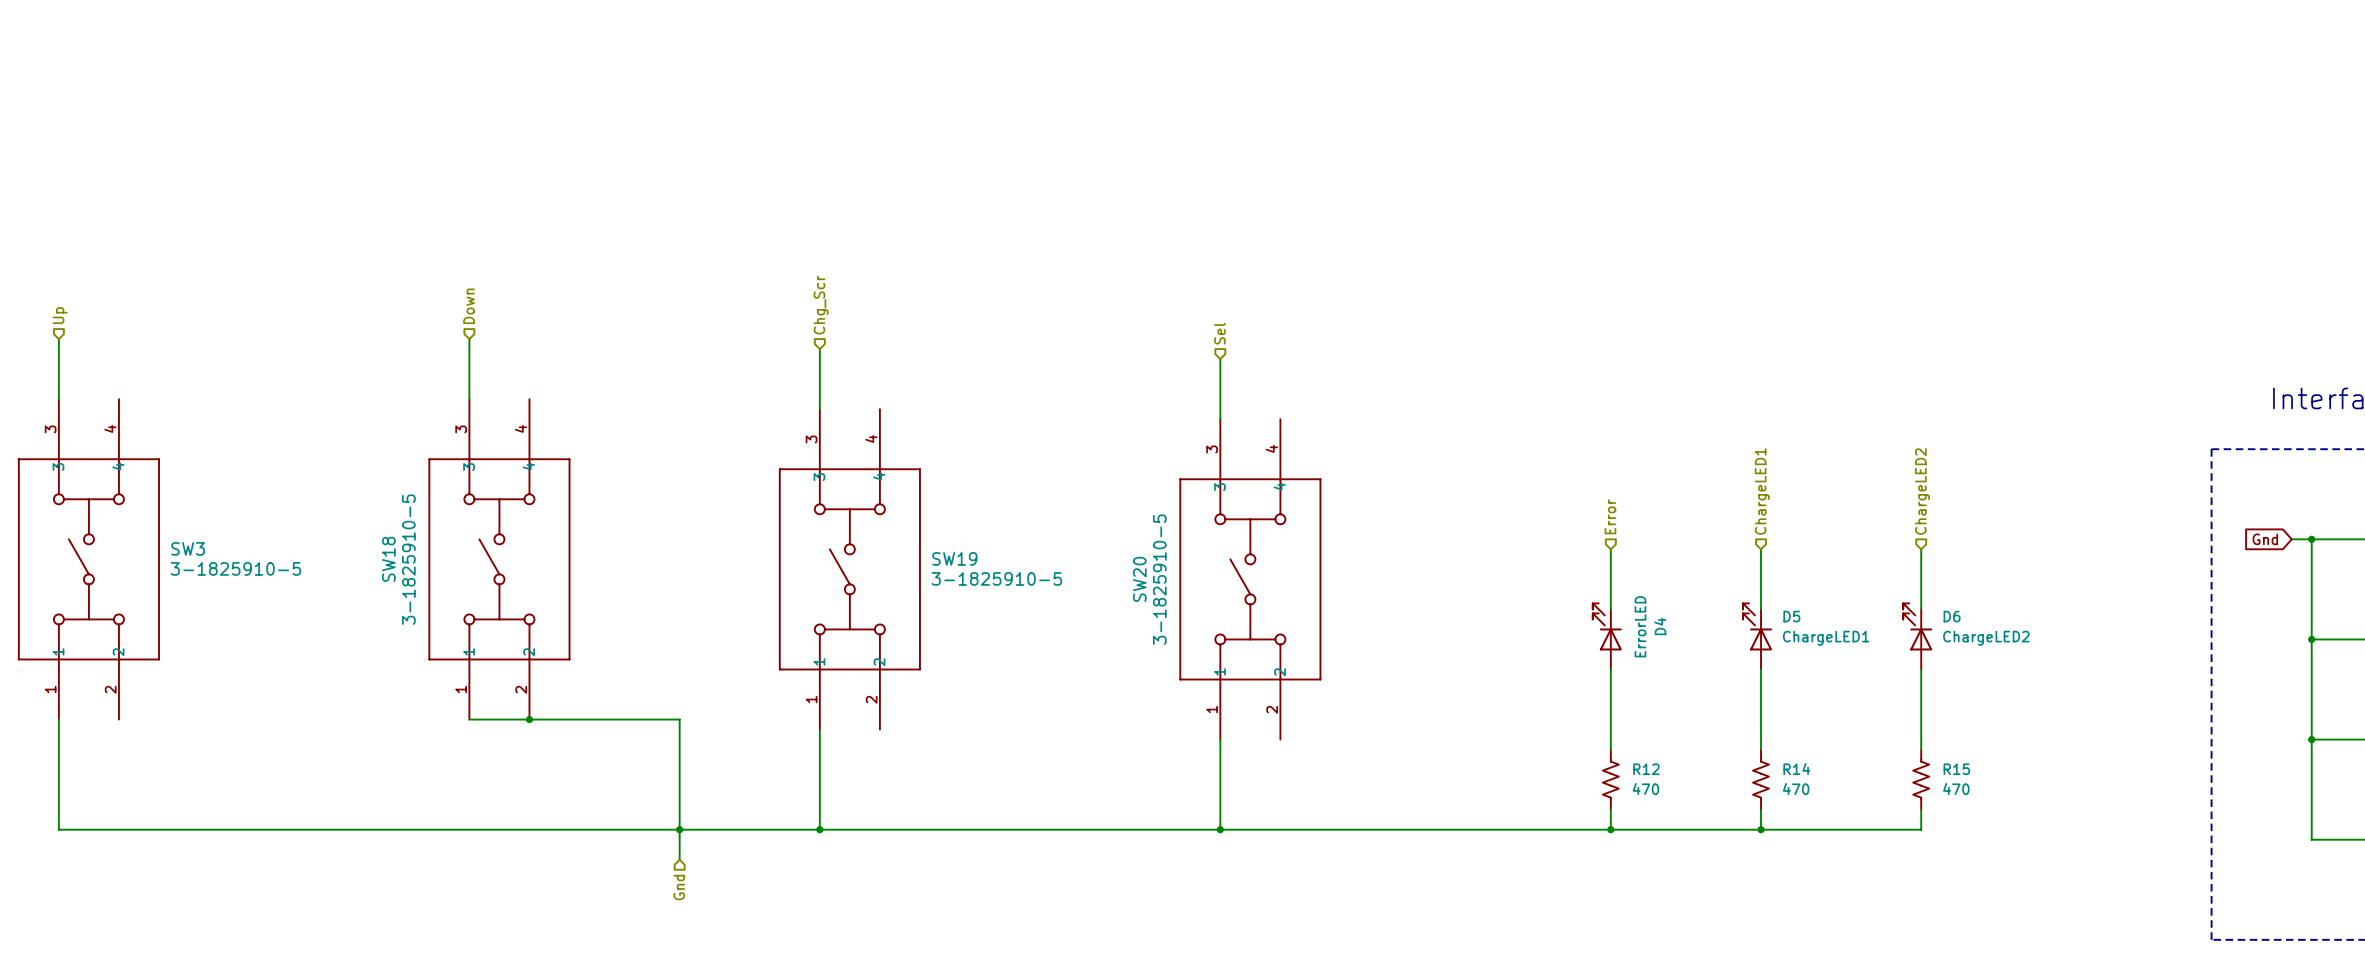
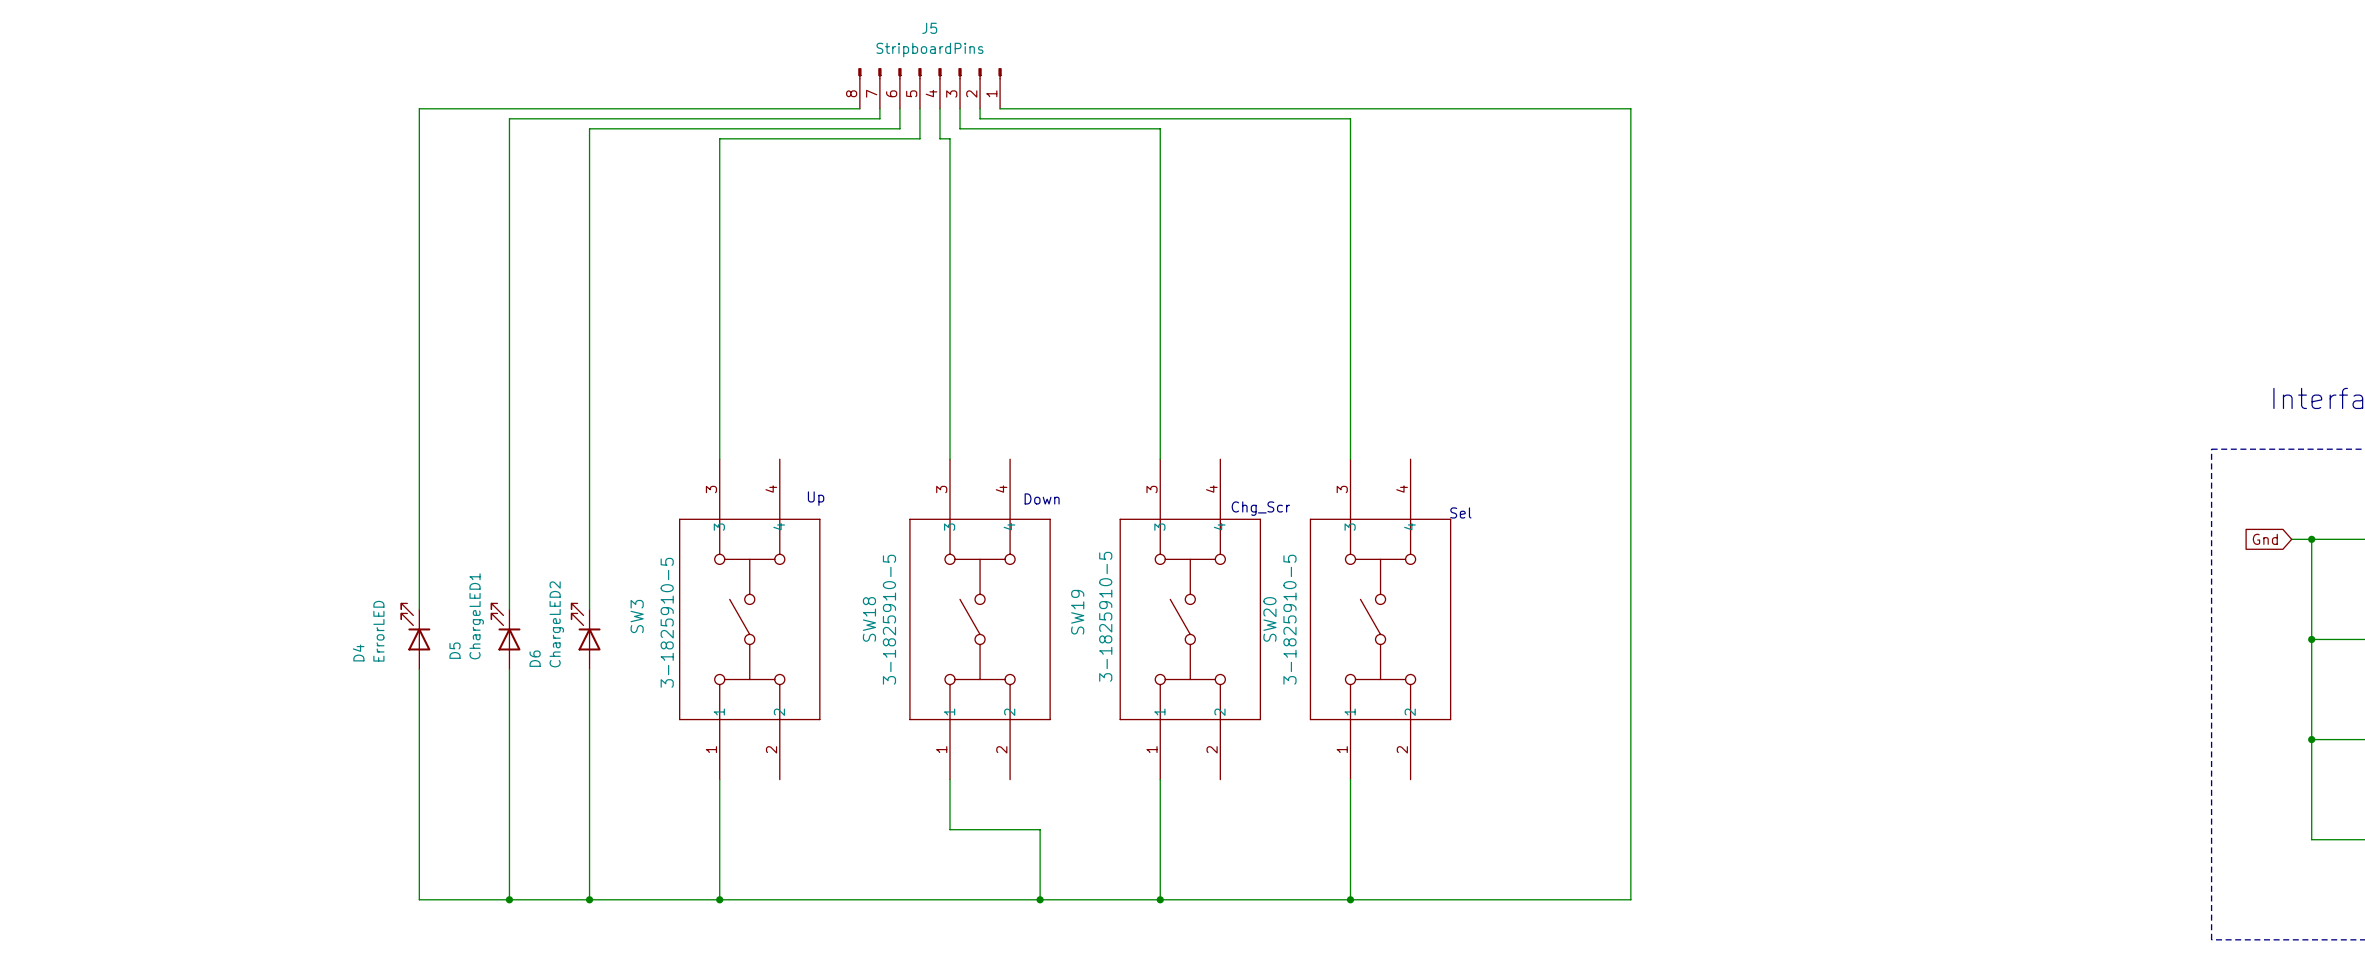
J5: none -> StripboardPins (929, 88)
wire: none -> (859, 108) (419, 108) (419, 609)
wire: none -> (879, 108) (879, 118) (509, 118) (509, 609)
wire: none -> (899, 108) (899, 128) (589, 128) (589, 609)
wire: none -> (919, 108) (919, 138) (719, 138) (719, 459)
wire: none -> (939, 108) (939, 138) (950, 138) (950, 459)
wire: none -> (960, 108) (960, 128) (1160, 128) (1160, 459)
wire: none -> (980, 108) (980, 118) (1350, 118) (1350, 459)
wire: none -> (1000, 108) (1630, 108) (1630, 899) (419, 899) (419, 669)
hierarchical label: Chg_Scr (821, 305) -> none
hierarchical label: Down (469, 306) -> none
hierarchical label: Up (60, 315) -> none
hierarchical label: Sel (1219, 333) -> none
wire: (58, 339) (58, 399) -> none
wire: (469, 339) (469, 399) -> none
wire: (819, 349) (819, 409) -> none
wire: (1220, 359) (1220, 419) -> none
hierarchical label: ChargeLED1 (1762, 491) -> none
hierarchical label: ChargeLED2 (1922, 491) -> none
text: none -> Up (816, 498)
text: none -> Down (1042, 498)
text: none -> Chg_Scr (1260, 508)
text: none -> Sel (1460, 512)
hierarchical label: Error (1610, 516) -> none
SW3 name rotation: 0° (188, 548) -> 90° counterclockwise (637, 616)
SW3 name position: SW3 (188, 548) -> SW3 (637, 616)
wire: (1610, 549) (1610, 609) -> none
wire: (1761, 549) (1761, 609) -> none
wire: (1921, 549) (1921, 609) -> none
SW19 name rotation: 0° (954, 558) -> 90° counterclockwise (1077, 612)
SW19 name position: SW19 (954, 558) -> SW19 (1077, 612)
SW3 position: (88, 559) -> (749, 619)
SW18 position: (499, 559) -> (980, 619)
SW3 value rotation: 0° (235, 568) -> 90° counterclockwise (667, 622)
SW3 value position: 3-1825910-5 (235, 568) -> 3-1825910-5 (667, 622)
SW19 position: (849, 569) -> (1190, 619)
SW19 value rotation: 0° (996, 578) -> 90° counterclockwise (1105, 616)
SW20 position: (1250, 579) -> (1380, 619)
D5 name rotation: 0° (1791, 616) -> 90° counterclockwise (455, 650)
D5 name position: D5 (1791, 616) -> D5 (455, 650)
D6 name rotation: 0° (1952, 616) -> 90° counterclockwise (535, 658)
D6 name position: D6 (1952, 616) -> D6 (535, 658)
D4 value position: ErrorLED (1640, 626) -> ErrorLED (378, 631)
D4 name position: D4 (1660, 626) -> D4 (358, 653)
D4 position: (1607, 636) -> (415, 636)
D5 position: (1757, 636) -> (505, 636)
D6 position: (1917, 636) -> (586, 636)
D5 value rotation: 0° (1826, 638) -> 90° counterclockwise (476, 616)
D5 value position: ChargeLED1 (1826, 638) -> ChargeLED1 (476, 616)
D6 value rotation: 0° (1986, 638) -> 90° counterclockwise (556, 624)
D6 value position: ChargeLED2 (1986, 638) -> ChargeLED2 (556, 624)
wire: none -> (509, 669) (509, 899)
wire: none -> (589, 669) (589, 899)
wire: (1610, 669) (1610, 749) -> none
wire: (1761, 669) (1761, 749) -> none
wire: (1921, 669) (1921, 749) -> none
wire: (58, 719) (58, 829) (950, 829) -> (950, 779) (950, 829)
wire: (469, 719) (679, 719) (679, 859) -> none
junction: (529, 719) -> none
wire: (819, 729) (819, 829) -> none
wire: (1220, 739) (1220, 829) -> none
wire: none -> (719, 779) (719, 899)
wire: none -> (1160, 779) (1160, 899)
wire: none -> (1350, 779) (1350, 899)
R12: 470 (1610, 779) -> none
R14: 470 (1761, 779) -> none
R15: 470 (1921, 779) -> none
wire: (1610, 809) (1610, 829) -> none
wire: (1761, 809) (1761, 829) -> none
wire: (1921, 809) (1921, 829) (1040, 829) -> (1040, 899) (1040, 829)
junction: (679, 829) -> none
junction: (819, 829) -> none
junction: (1220, 829) -> none
junction: (1610, 829) -> none
junction: (1761, 829) -> none
hierarchical label: Gnd (679, 887) -> none
junction: none -> (509, 899)
junction: none -> (589, 899)
junction: none -> (719, 899)
junction: none -> (1040, 899)
junction: none -> (1160, 899)
junction: none -> (1350, 899)

